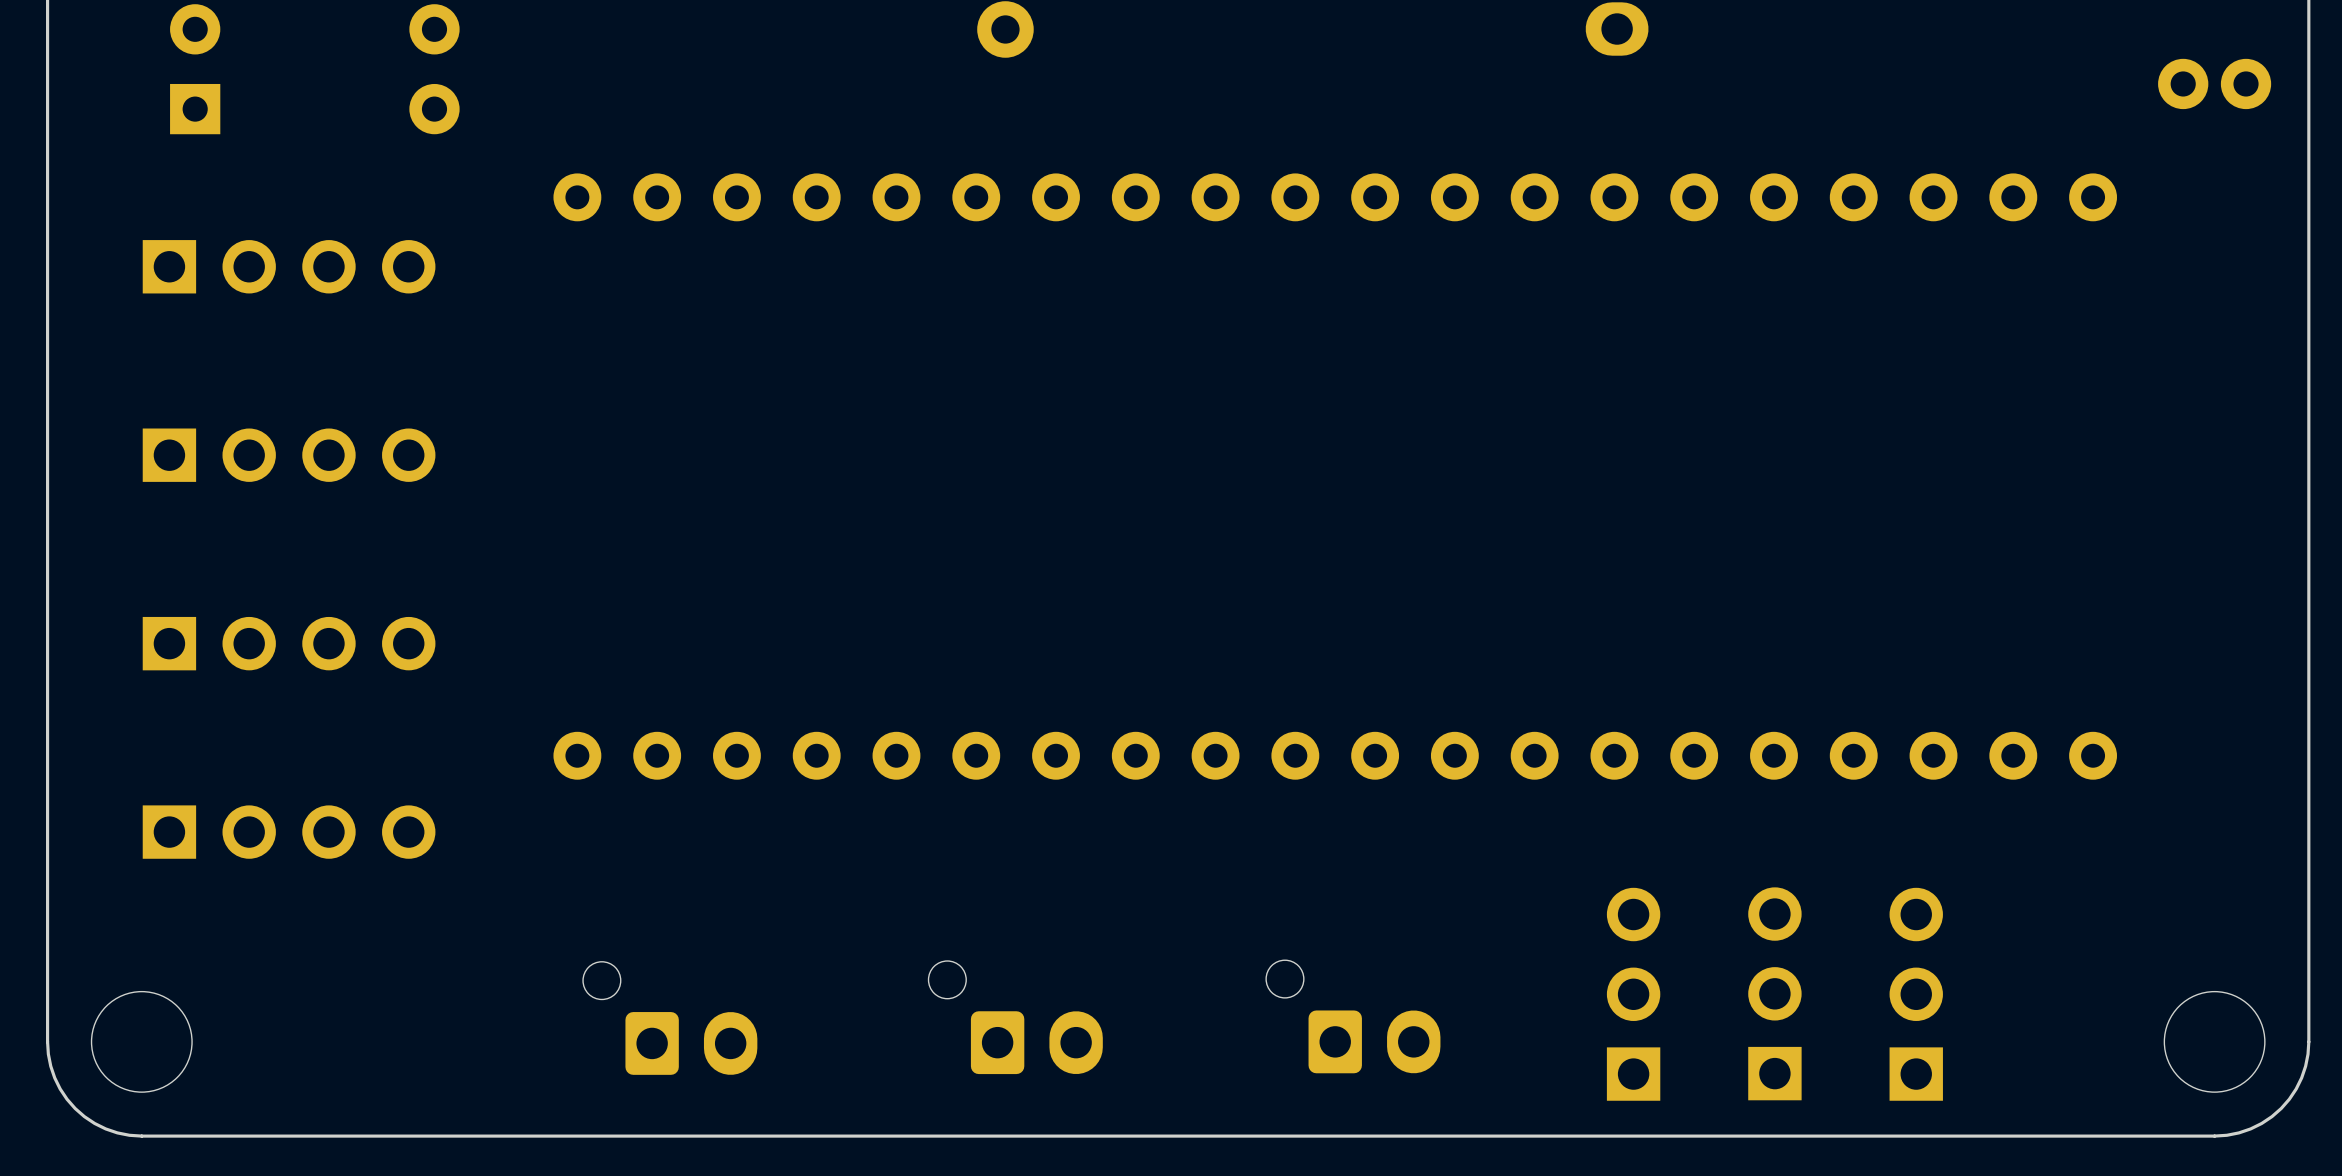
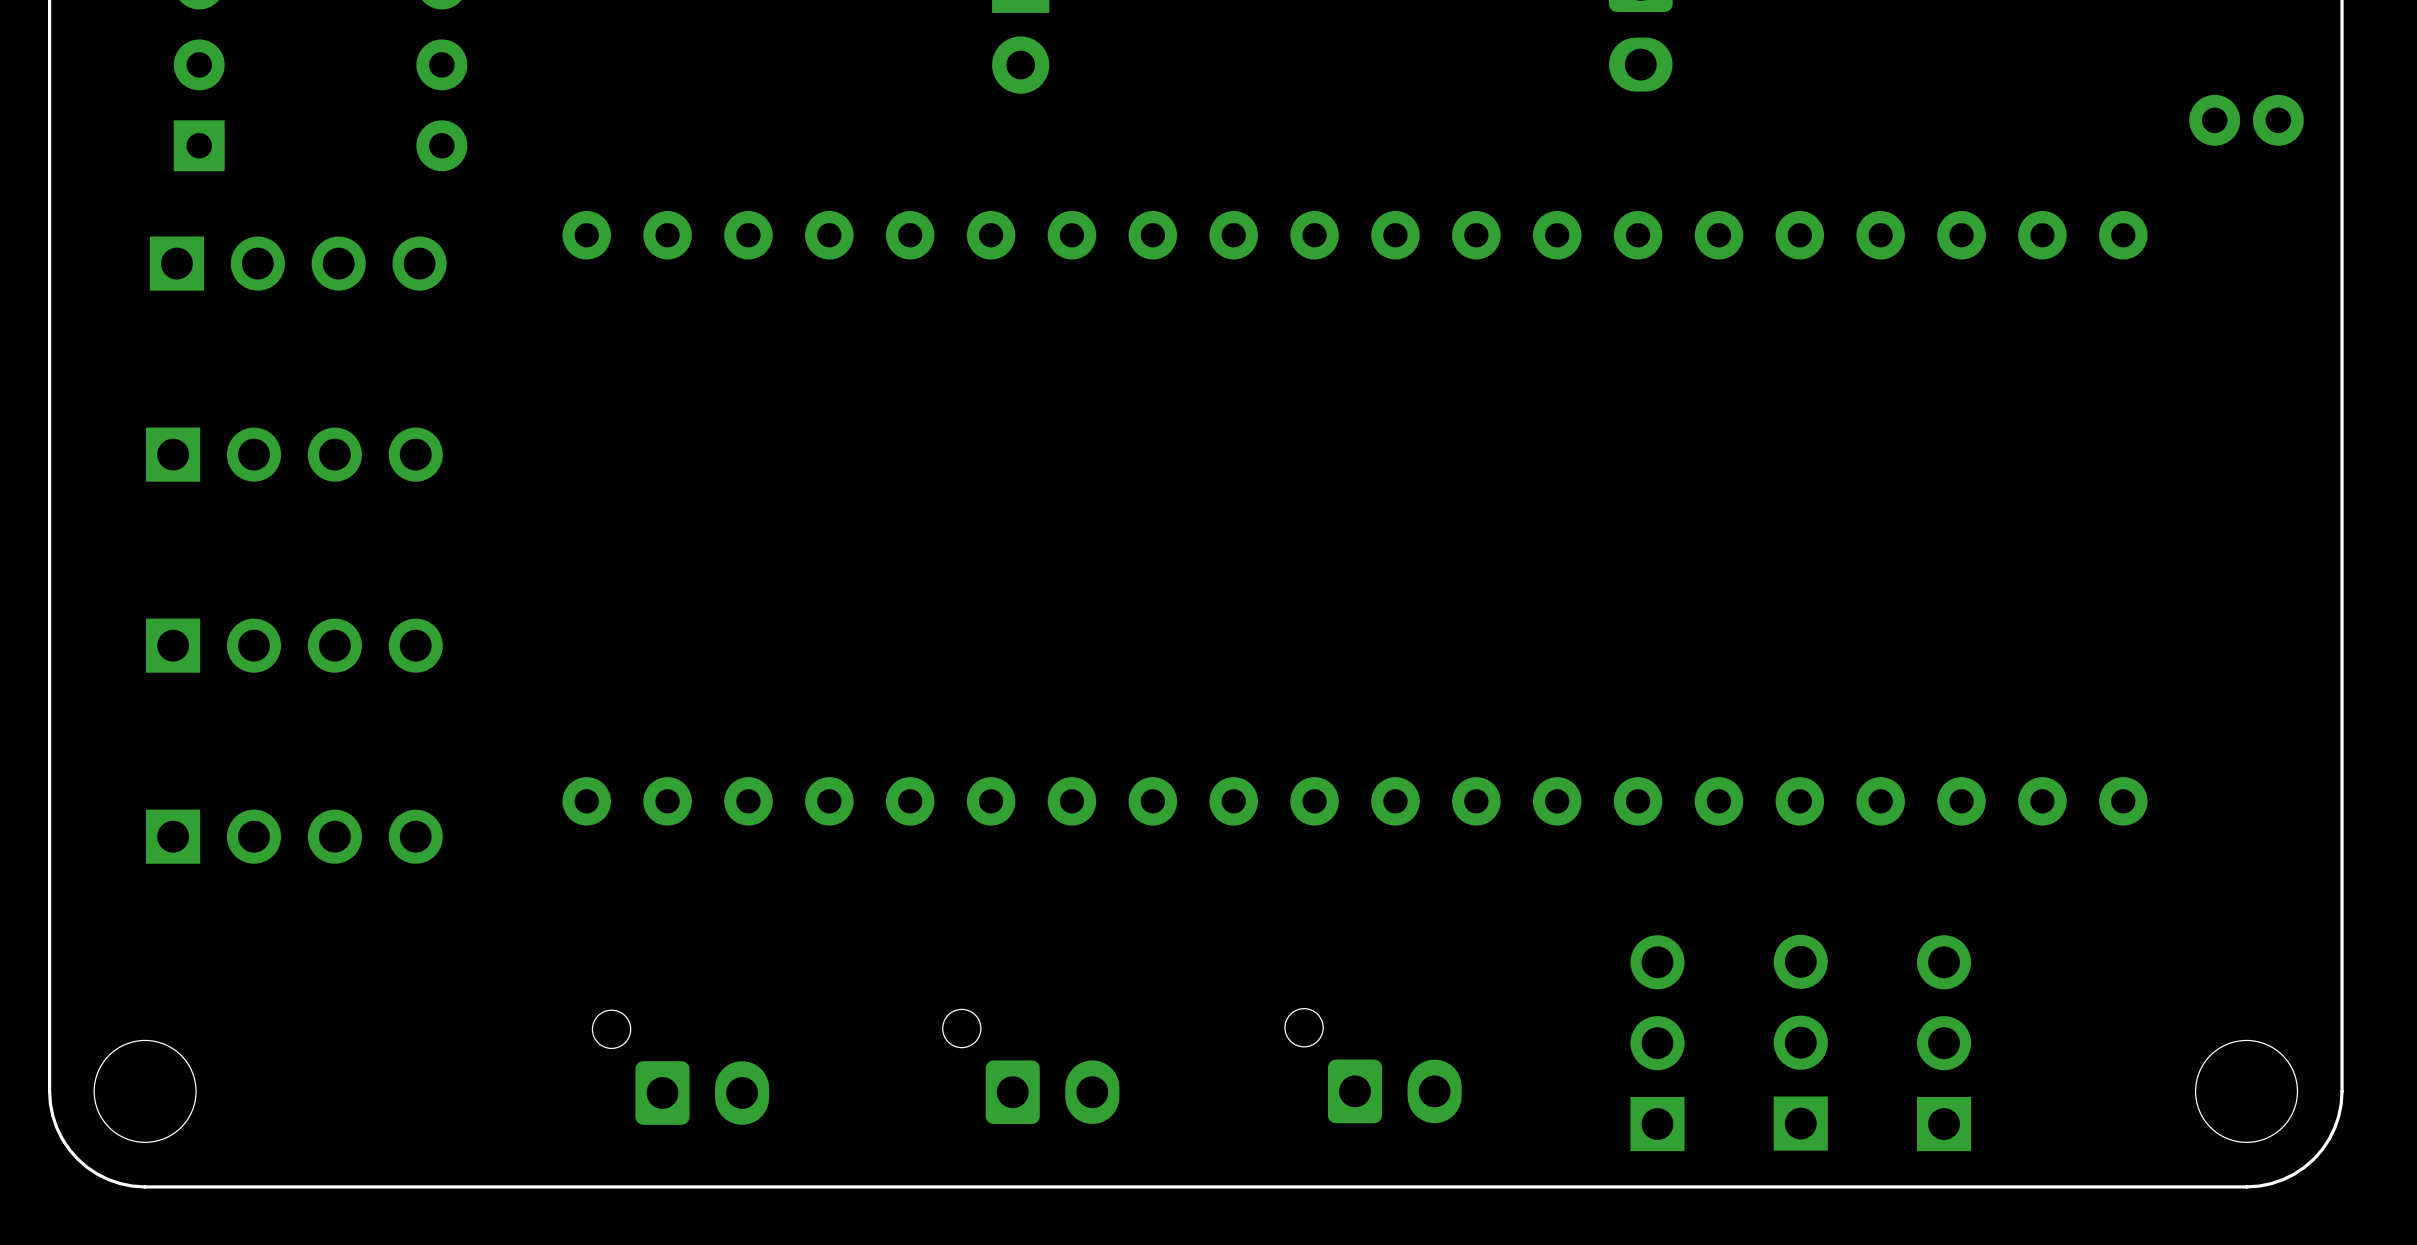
part position: (289, 266) -> (298, 263)
part position: (289, 455) -> (294, 454)
part position: (289, 643) -> (294, 645)
part position: (289, 832) -> (294, 836)

